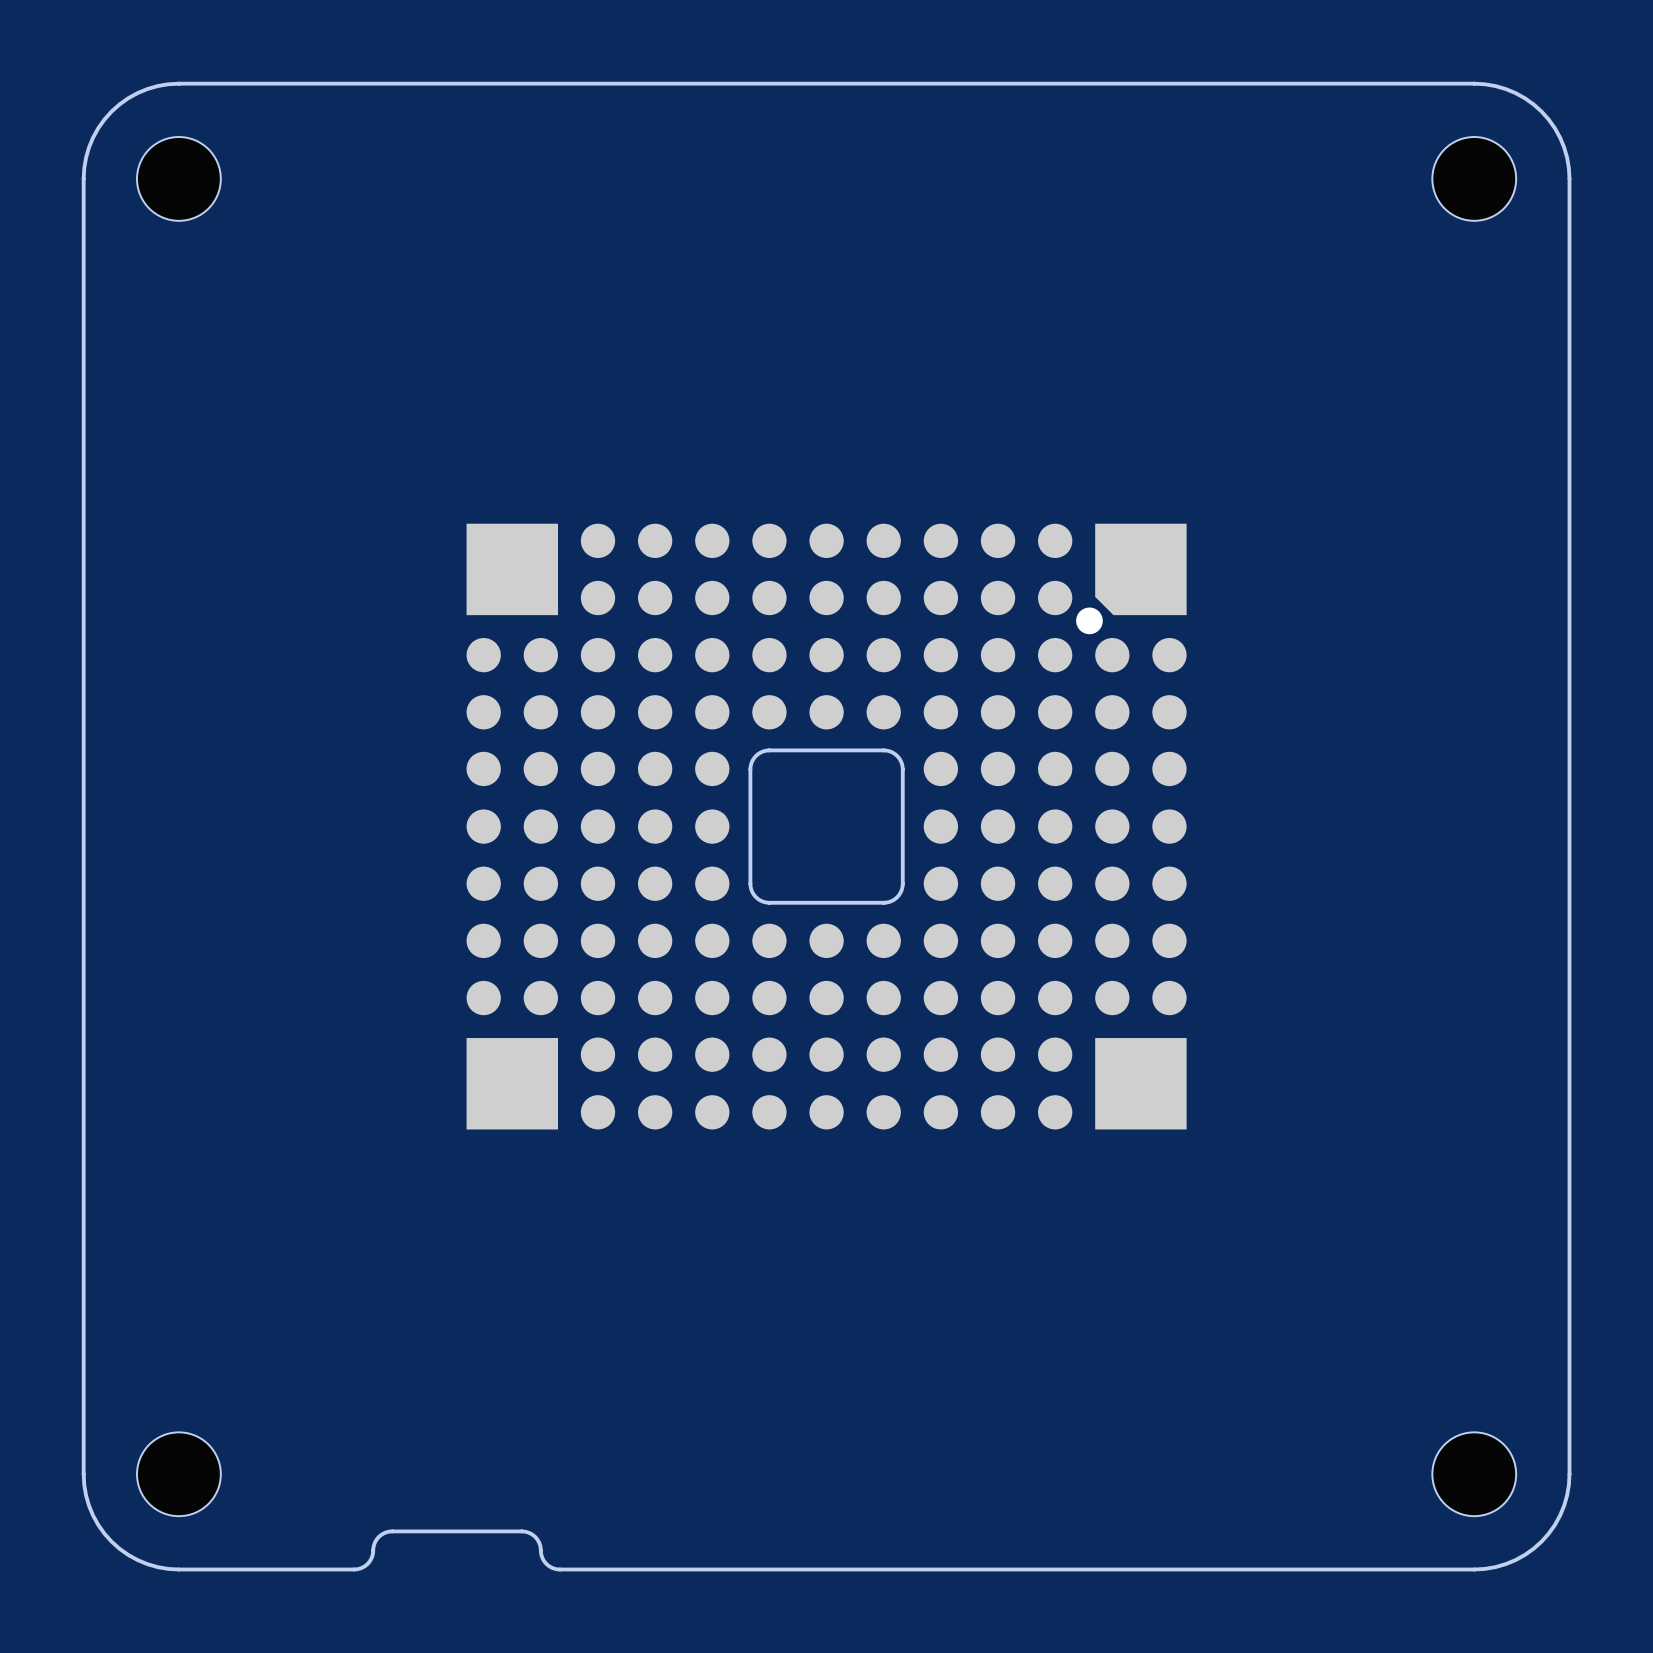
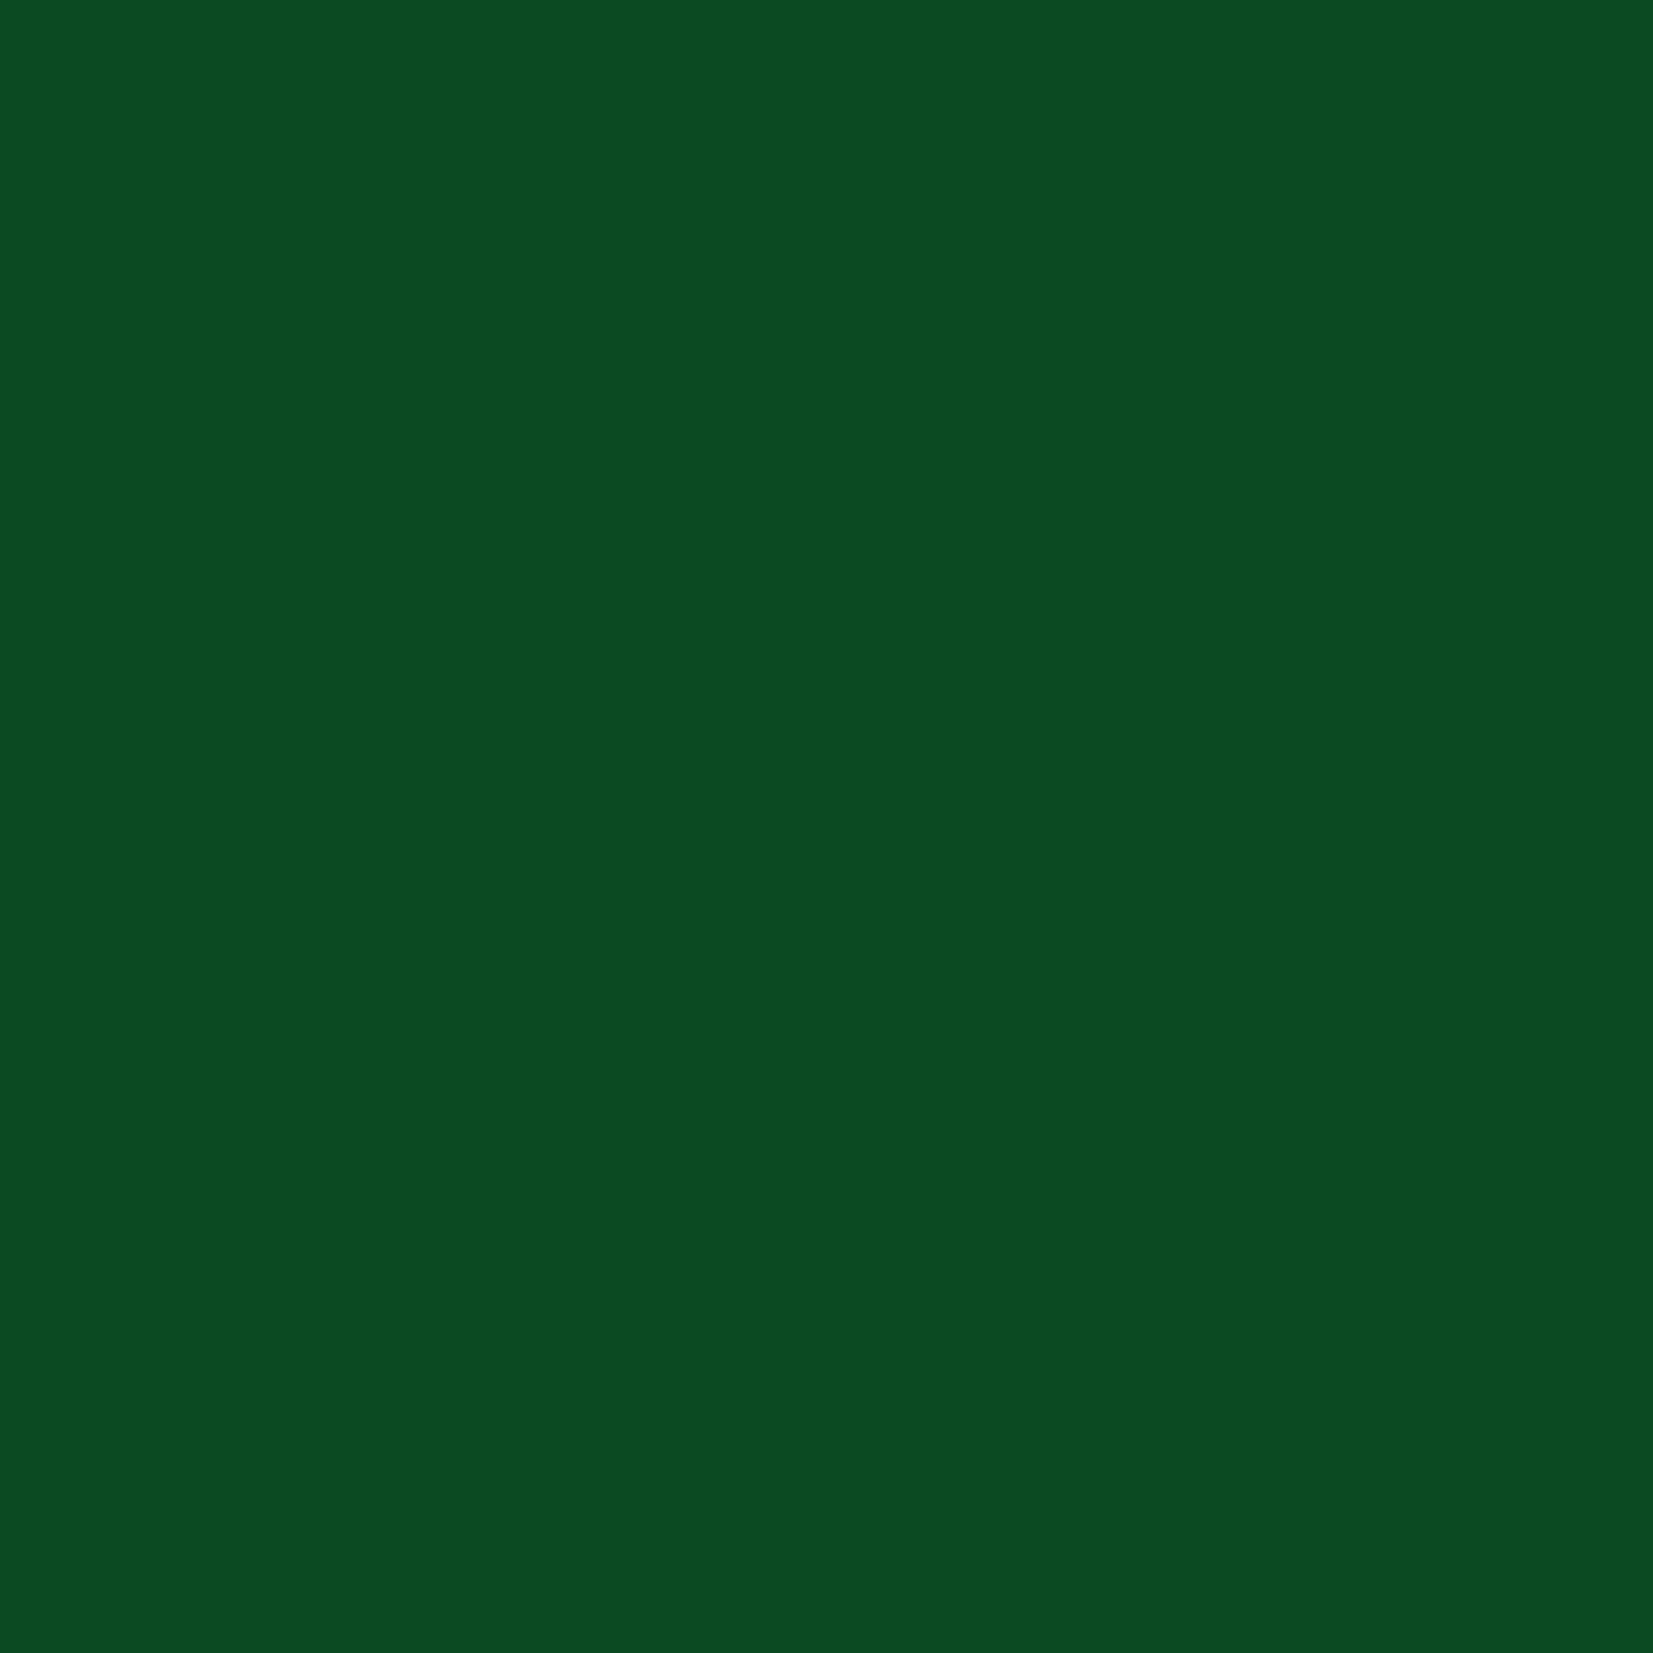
board edge: (1474, 83) (178, 83) (147, 89) (128, 98) (111, 111) (98, 128) (89, 147) (83, 178) (83, 1474) (89, 1505) (98, 1524) (111, 1541) (137, 1560) (157, 1567) (178, 1569) (356, 1569) (369, 1562) (374, 1543) (378, 1536) (392, 1531) (526, 1532) (538, 1540) (542, 1557) (546, 1563) (559, 1569) (1474, 1569) (1495, 1567) (1515, 1560) (1541, 1541) (1560, 1515) (1567, 1495) (1569, 1474) (1569, 178) (1567, 157) (1560, 137) (1541, 111) (1524, 98) (1505, 89) (1474, 83) -> none
part: (178, 178) -> none
part: (1474, 178) -> none
board edge: (883, 750) (769, 750) (759, 752) (754, 757) (750, 769) (750, 883) (751, 891) (757, 898) (769, 902) (883, 902) (891, 901) (898, 895) (902, 883) (902, 766) (895, 754) (883, 750) -> none
part: (826, 826) -> none
part: (178, 1474) -> none
part: (1474, 1474) -> none

